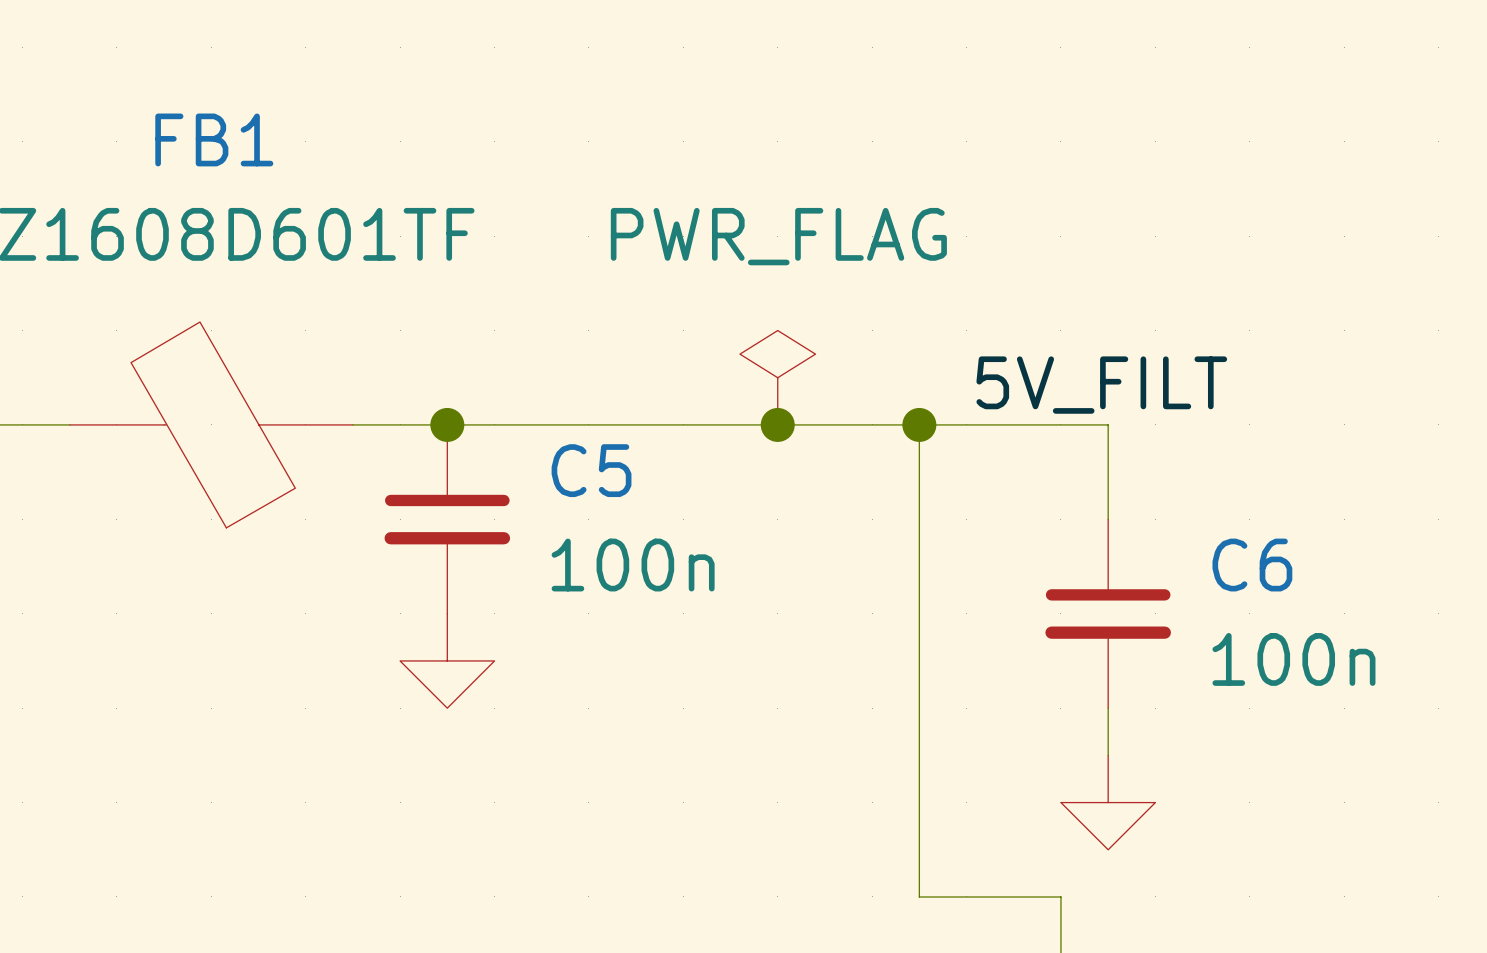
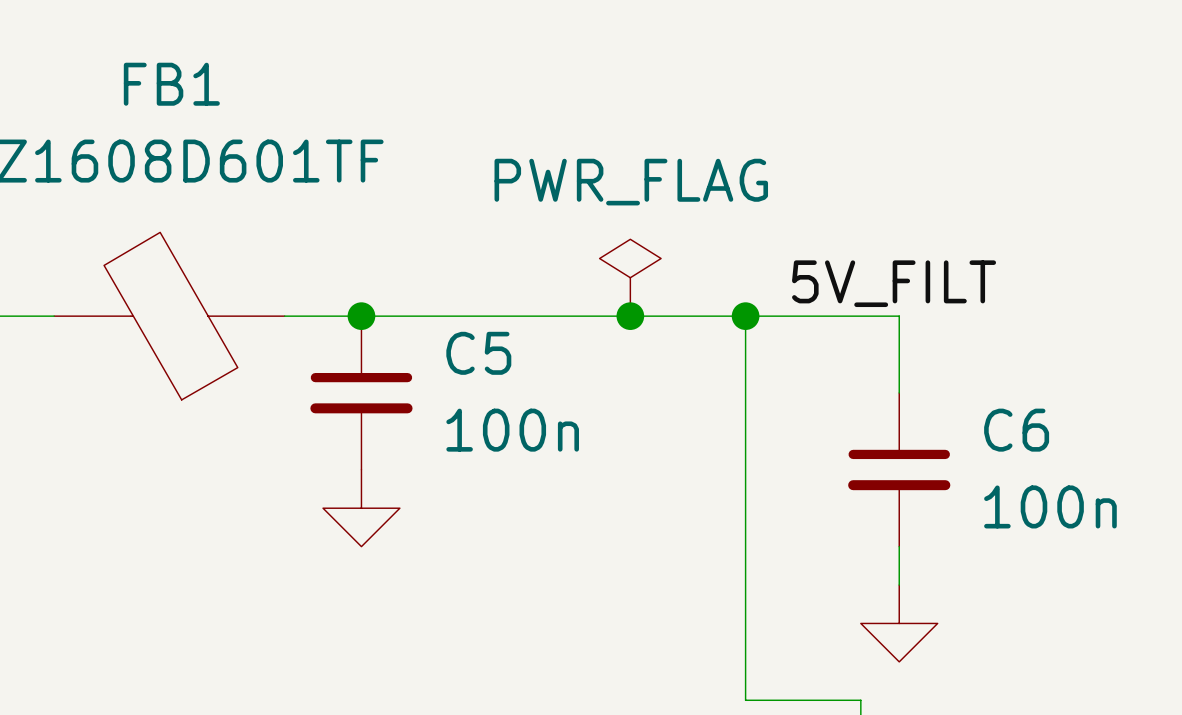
power symbol text position: PWR_FLAG (778, 236) -> PWR_FLAG (631, 182)

